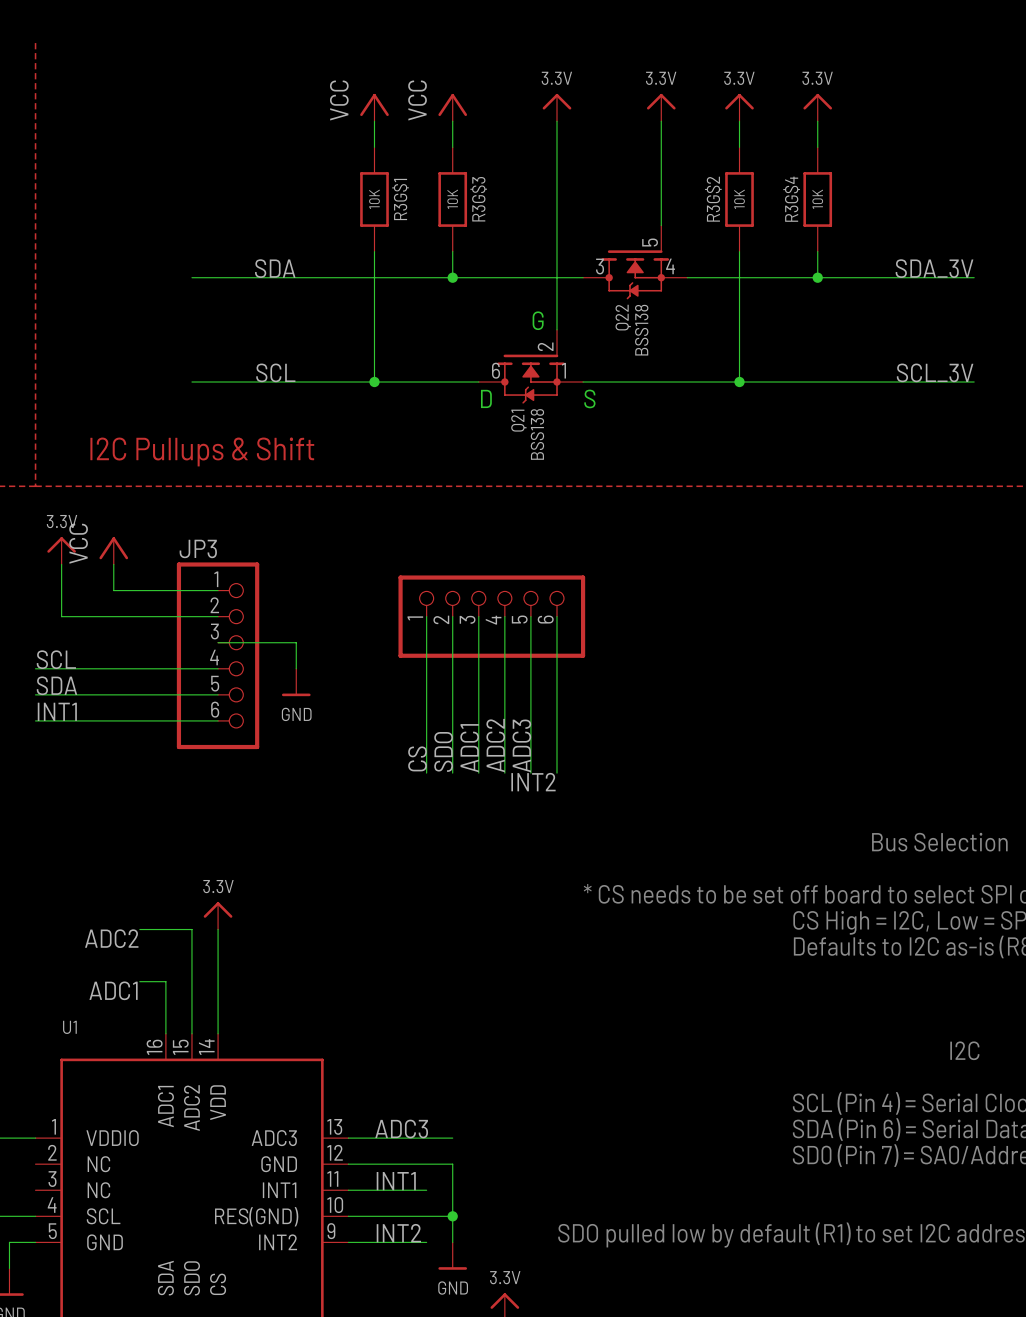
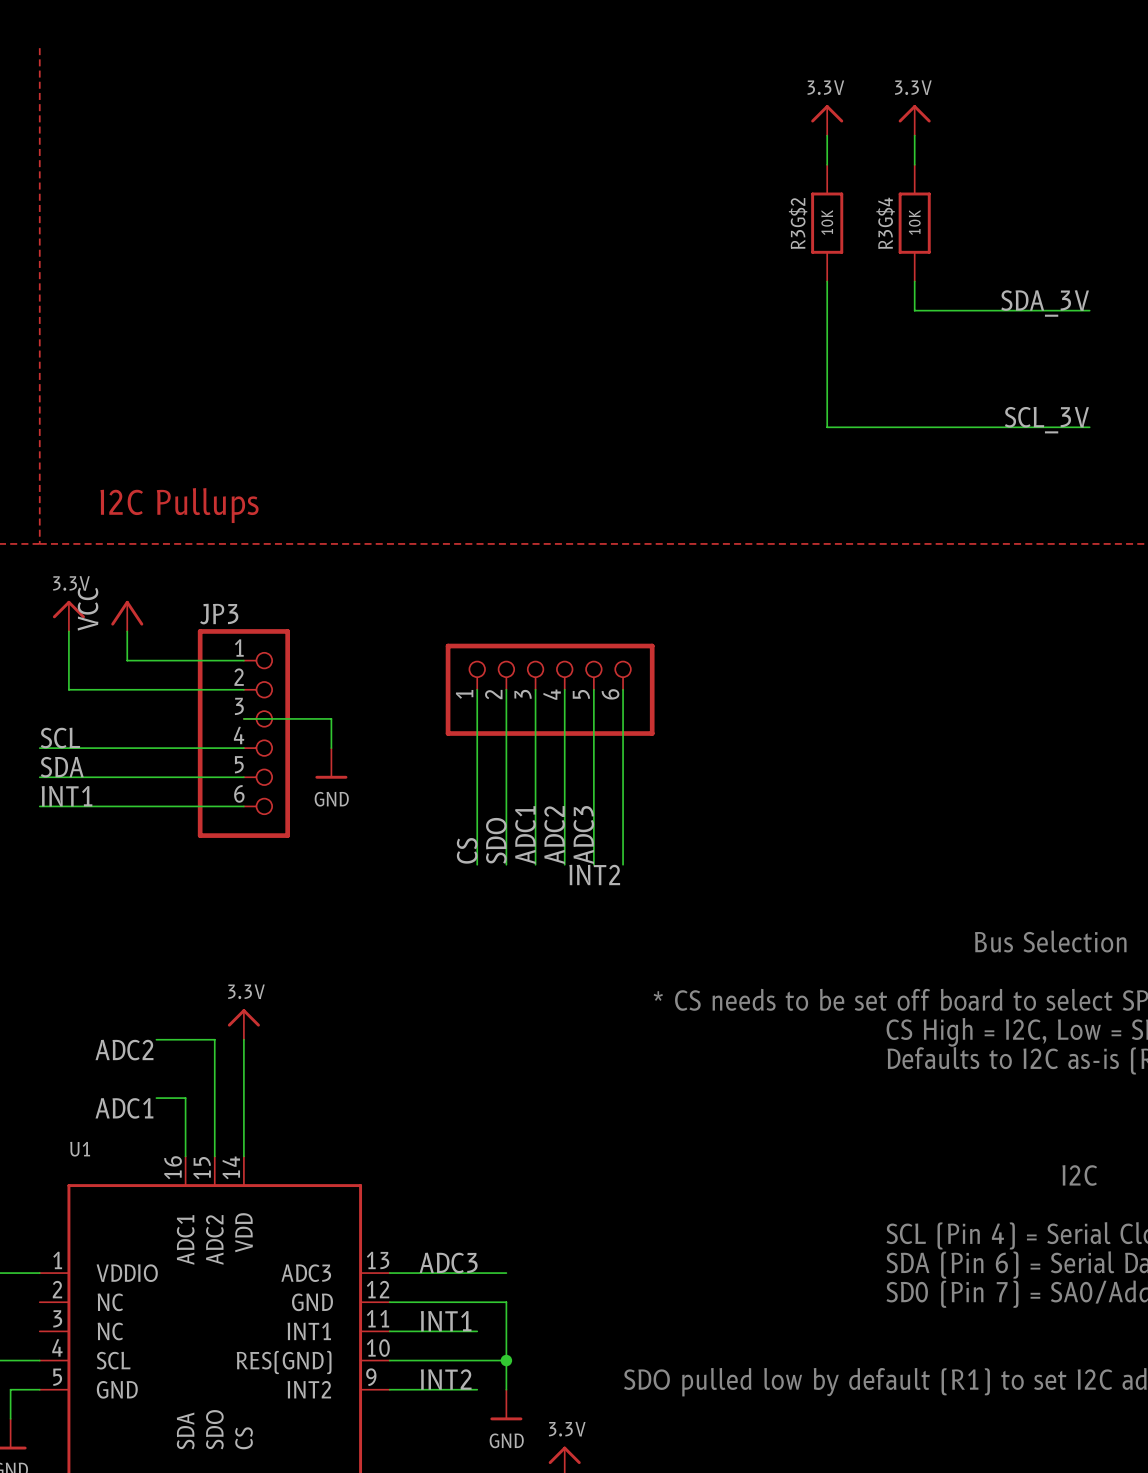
power symbol: VCC (374, 107) -> none
power symbol: VCC (452, 107) -> none
power symbol: 3.3V (557, 107) -> none
power symbol: 3.3V (661, 107) -> none
wire: (374, 121) (374, 147) -> none
wire: (452, 121) (452, 147) -> none
wire: (557, 121) (557, 329) -> none
wire: (661, 121) (661, 225) -> none
R3G$1: 10K (374, 199) -> none
R3G$3: 10K (452, 199) -> none
wire: (374, 251) (374, 382) -> none
wire: (452, 251) (452, 277) -> none
Q22: BSS138 (635, 262) -> none
label: SDA (275, 268) -> none
wire: (191, 277) (583, 277) -> none
junction: (452, 277) -> none
wire: (687, 277) (817, 277) -> none
junction: (817, 277) -> none
text: G (538, 320) -> none
Q21: BSS138 (530, 366) -> none
label: SCL (275, 372) -> none
wire: (191, 382) (478, 382) -> none
junction: (374, 382) -> none
wire: (583, 382) (739, 382) -> none
junction: (739, 382) -> none
text: D (486, 398) -> none
text: S (589, 398) -> none
text: I2C Pullups & Shift (202, 451) -> I2C Pullups (179, 505)

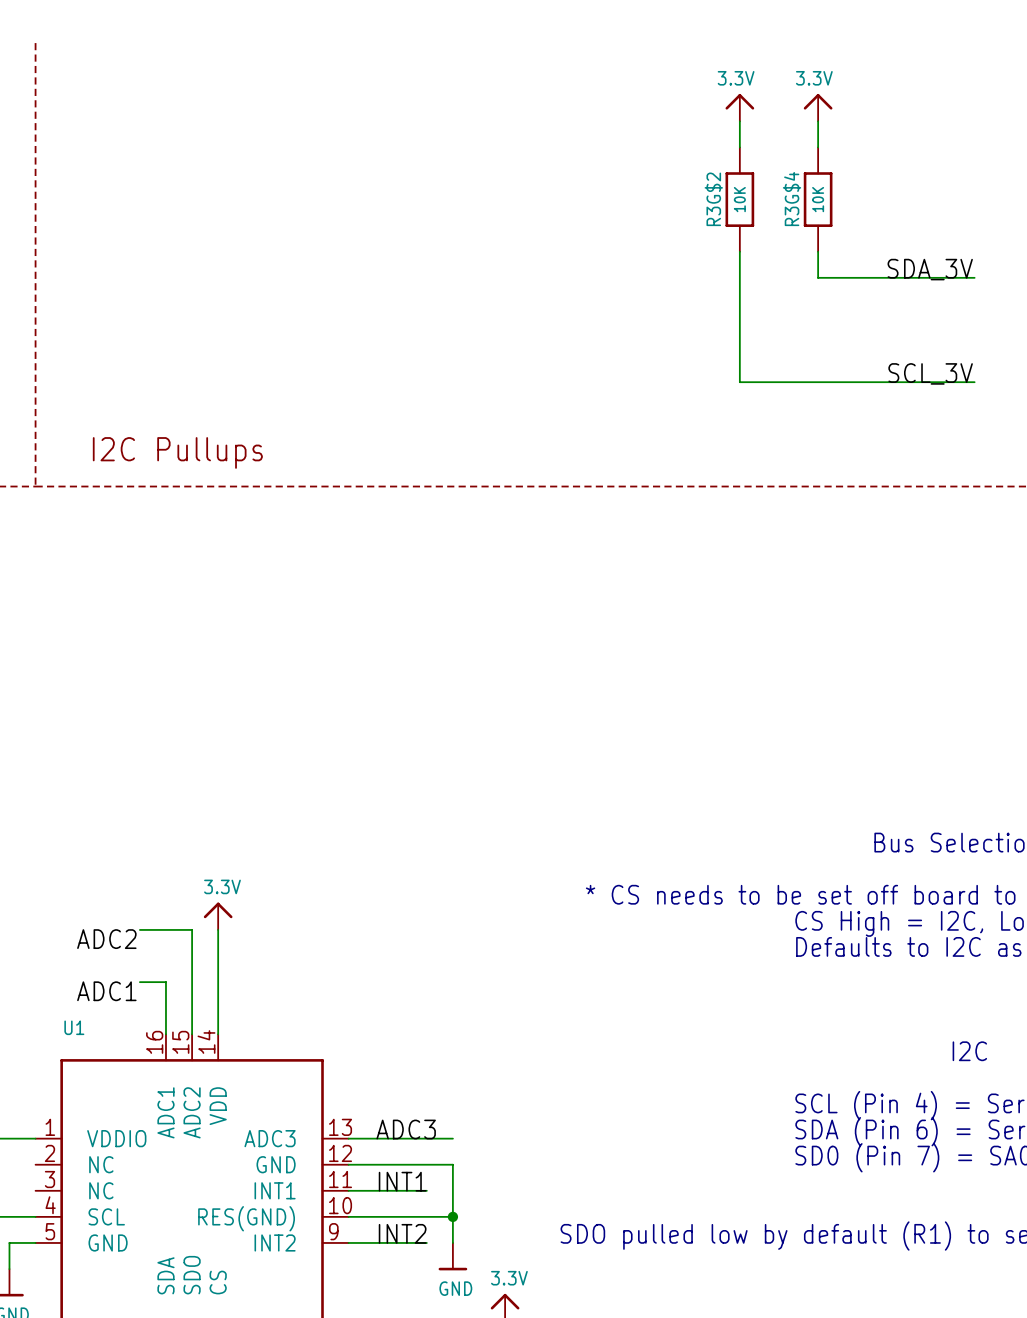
power symbol: 3.3V (68, 616) -> none
power symbol: VCC (127, 616) -> none
wire: (68, 631) (68, 689) (243, 689) -> none
wire: (127, 631) (127, 660) (243, 660) -> none
wire: (477, 689) (477, 864) -> none
wire: (506, 689) (506, 864) -> none
wire: (535, 689) (535, 864) -> none
part: (550, 689) -> none
wire: (564, 689) (564, 864) -> none
wire: (593, 689) (593, 864) -> none
wire: (623, 689) (623, 864) -> none
wire: (243, 718) (331, 718) (331, 748) -> none
JP3: (243, 733) -> none
label: SCL (60, 738) -> none
wire: (39, 748) (243, 748) -> none
power symbol: GND (331, 763) -> none
label: SDA (62, 767) -> none
wire: (39, 777) (243, 777) -> none
label: INT1 (67, 796) -> none
wire: (39, 806) (243, 806) -> none
label: ADC1 (525, 835) -> none
label: ADC2 (554, 835) -> none
label: ADC3 (583, 835) -> none
label: SDO (496, 840) -> none
label: CS (467, 850) -> none
label: INT2 (594, 874) -> none

